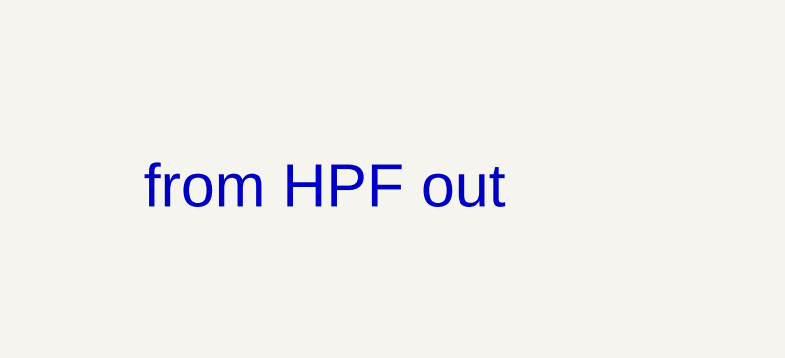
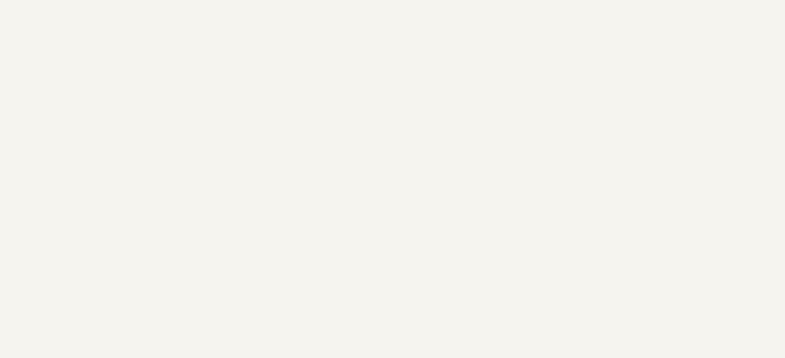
text: from HPF out (324, 184) -> none

